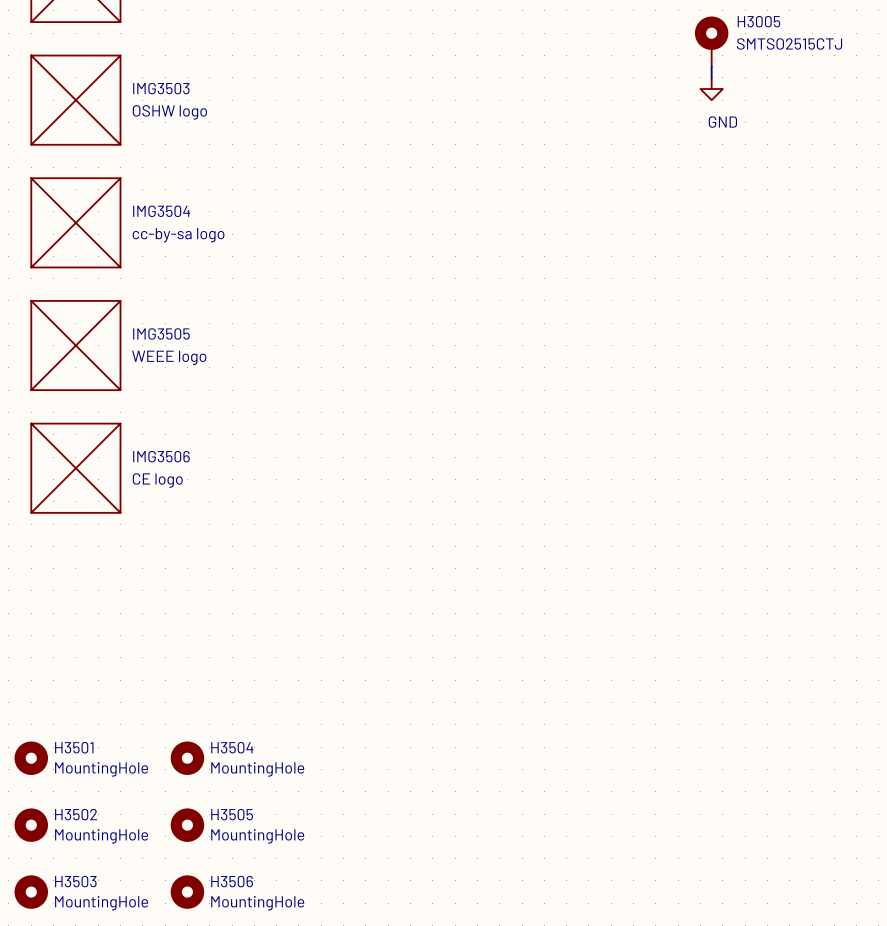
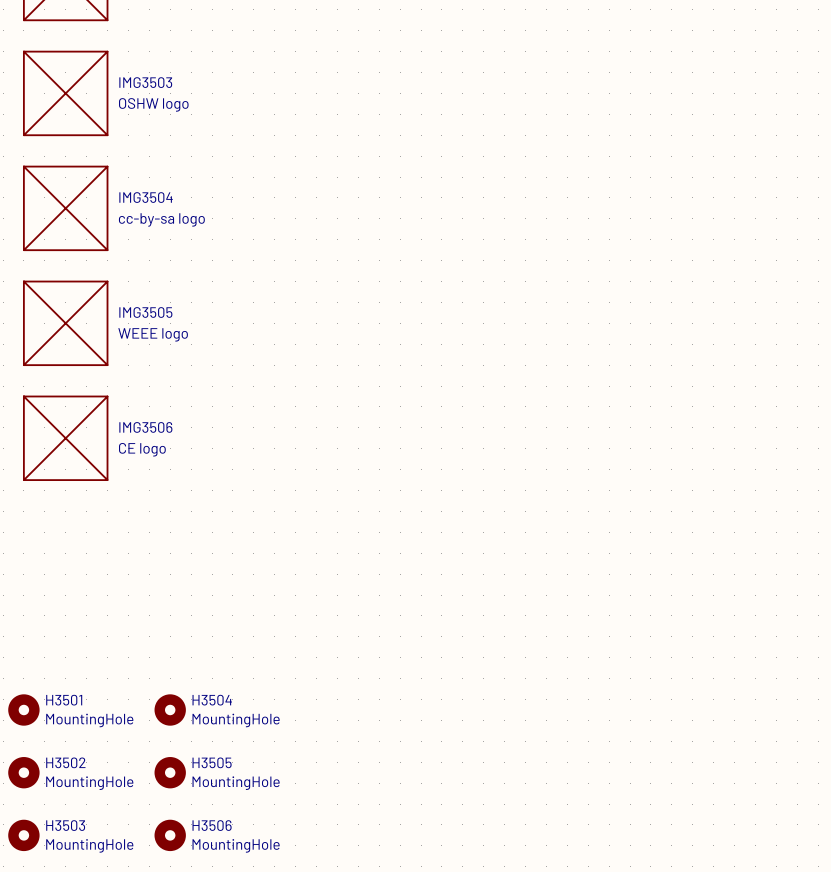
H3005: SMTSO2515CTJ (711, 41) -> none
wire: (711, 66) (711, 77) -> none
power symbol: GND (711, 89) -> none

